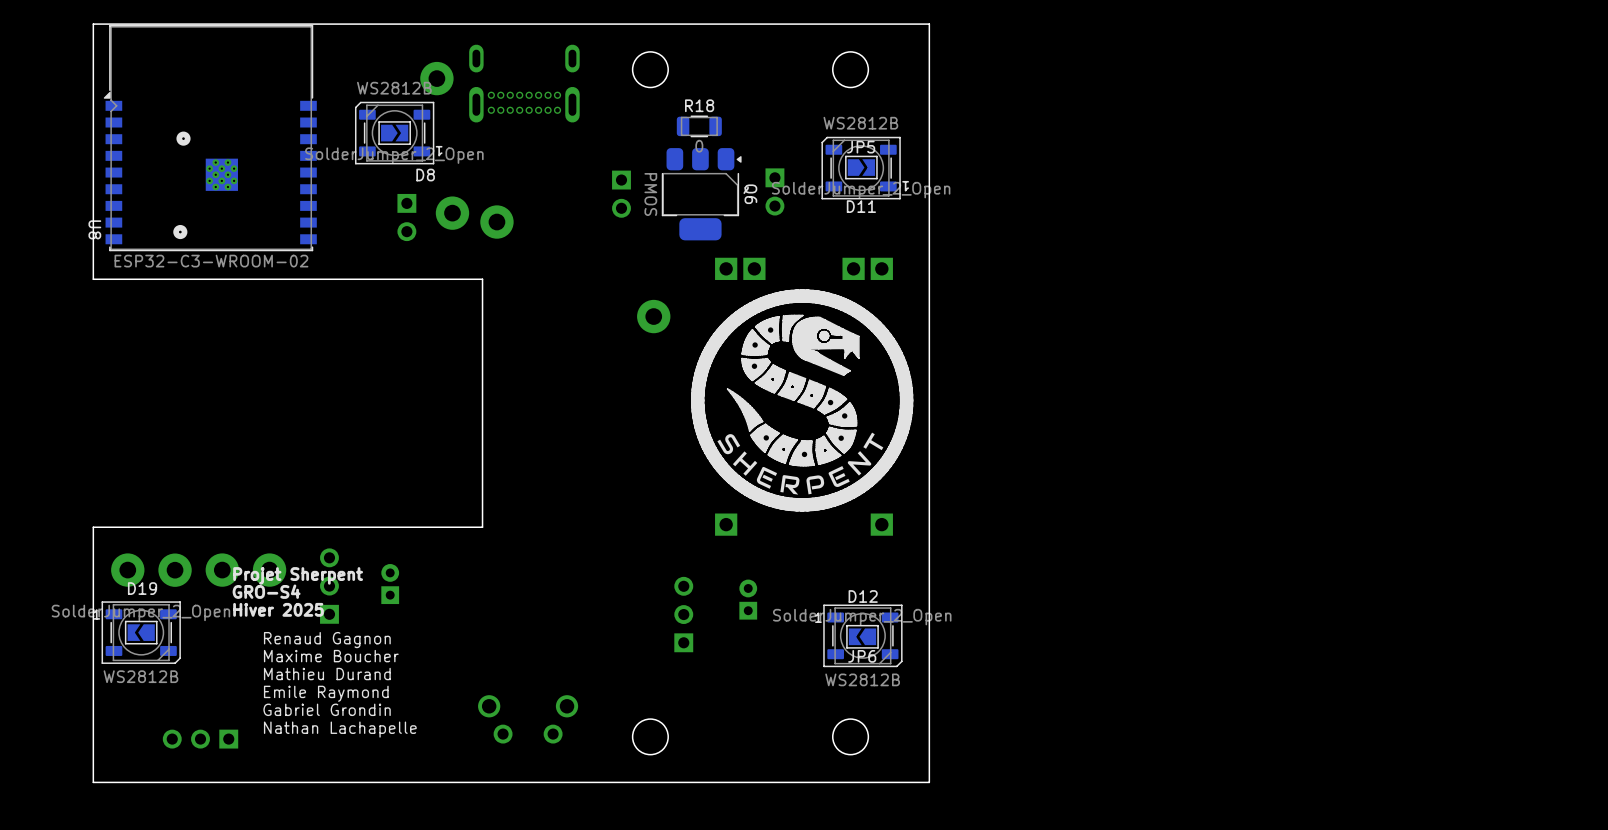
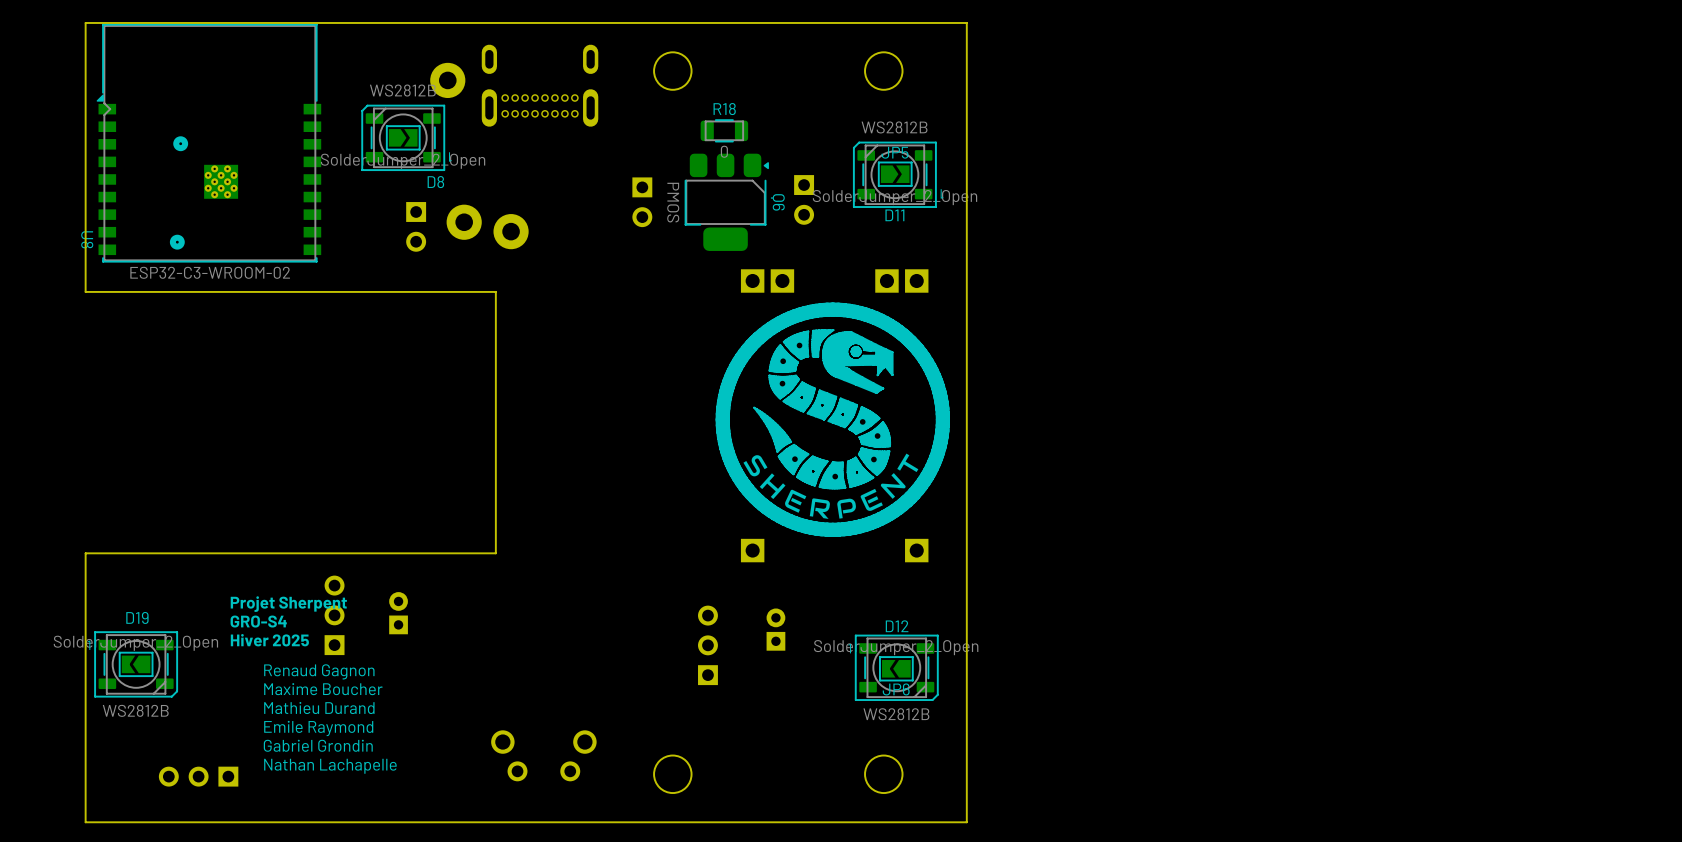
part: (653, 316) -> none
part: (127, 570) -> none
part: (175, 570) -> none
part: (222, 570) -> none
part: (269, 570) -> none

